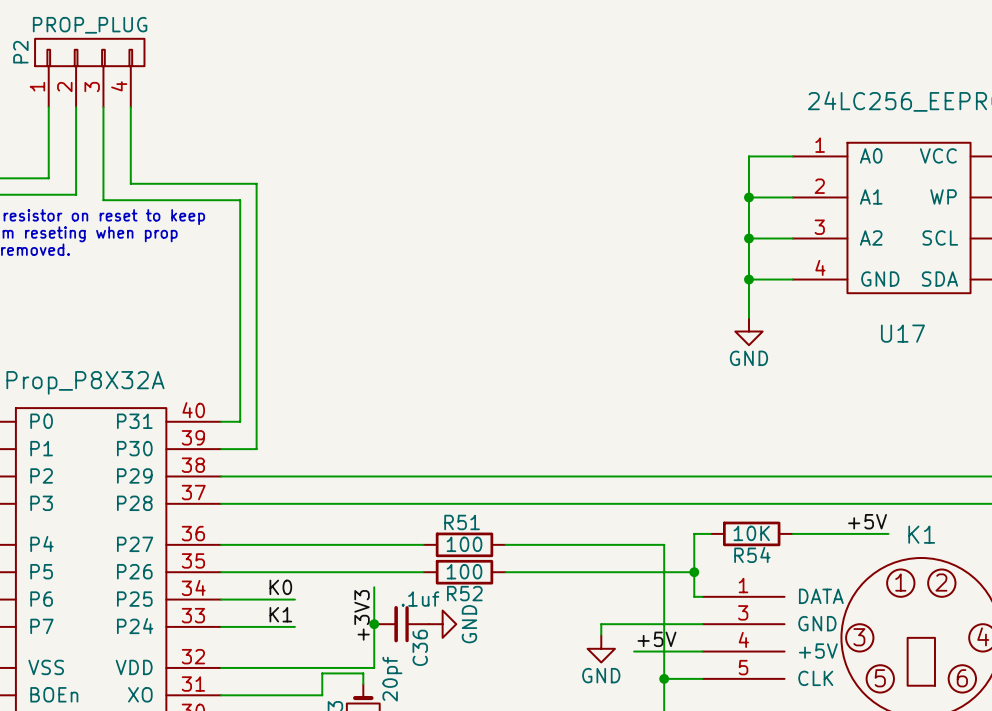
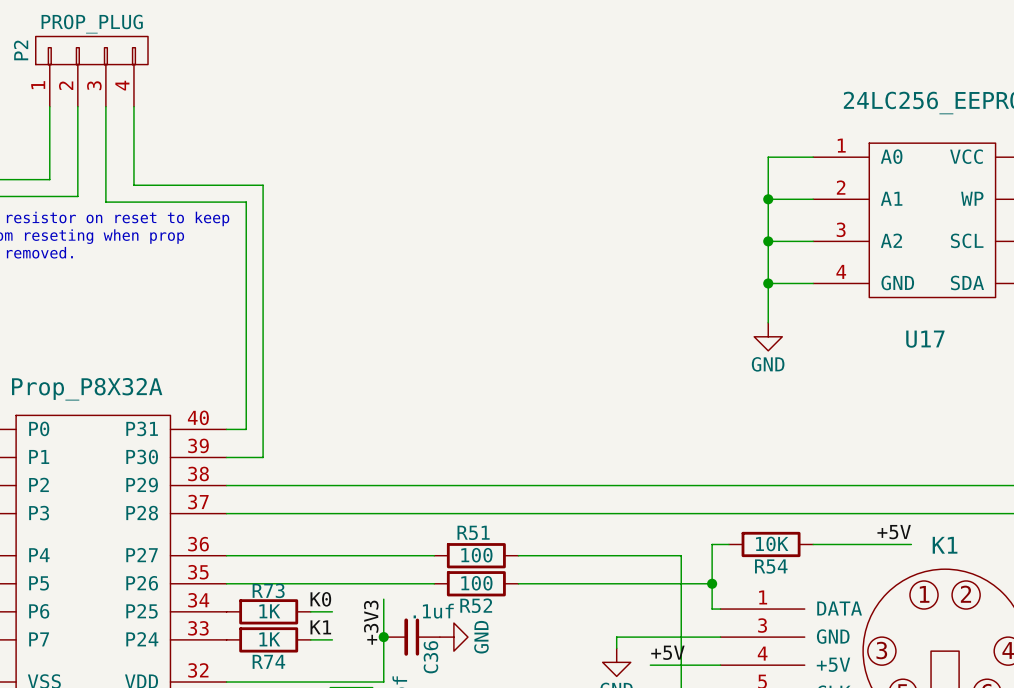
label position: K0 (280, 587) -> K0 (320, 599)
wire: (221, 599) (294, 599) -> none
R73: none -> 1K (268, 611)
wire: none -> (310, 611) (332, 611)
label position: K1 (280, 614) -> K1 (320, 627)
wire: (221, 626) (294, 626) -> none
R74: none -> 1K (268, 639)
wire: none -> (310, 639) (332, 639)

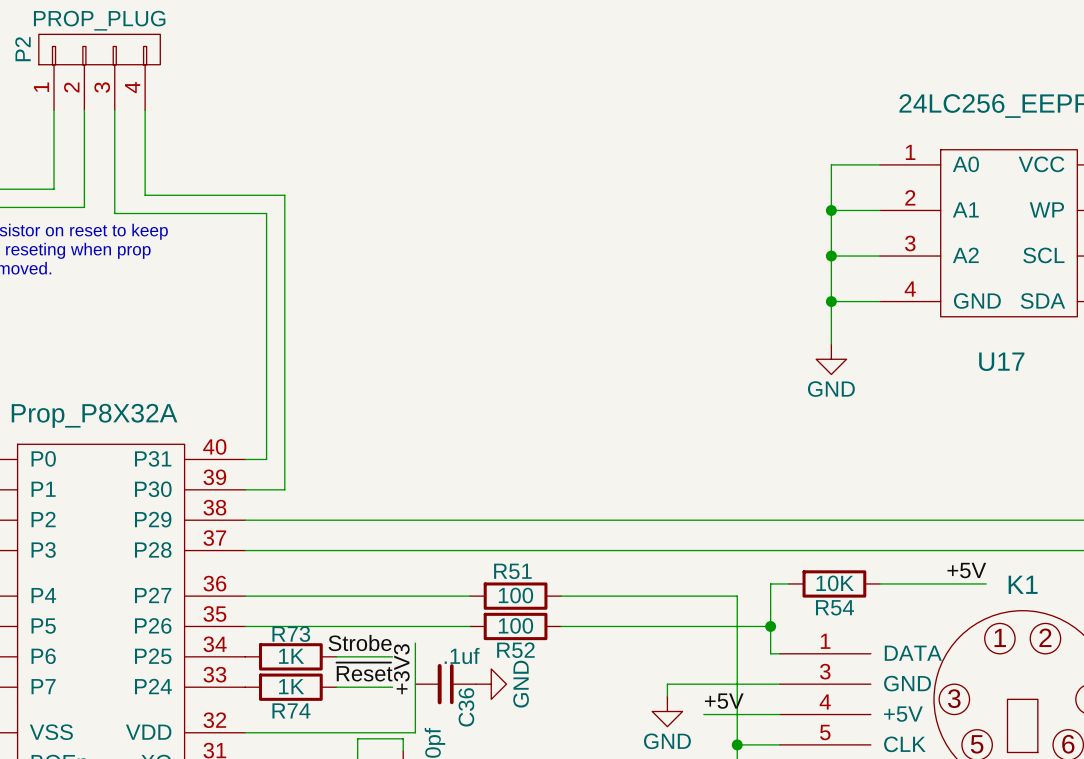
label: K0 (320, 599) -> none
label: none -> Strobe (360, 643)
wire: none -> (359, 656) (392, 656)
label: none -> ~{Reset} (364, 672)
label: K1 (320, 627) -> none
junction: (383, 637) -> none
wire: none -> (359, 687) (392, 687)

